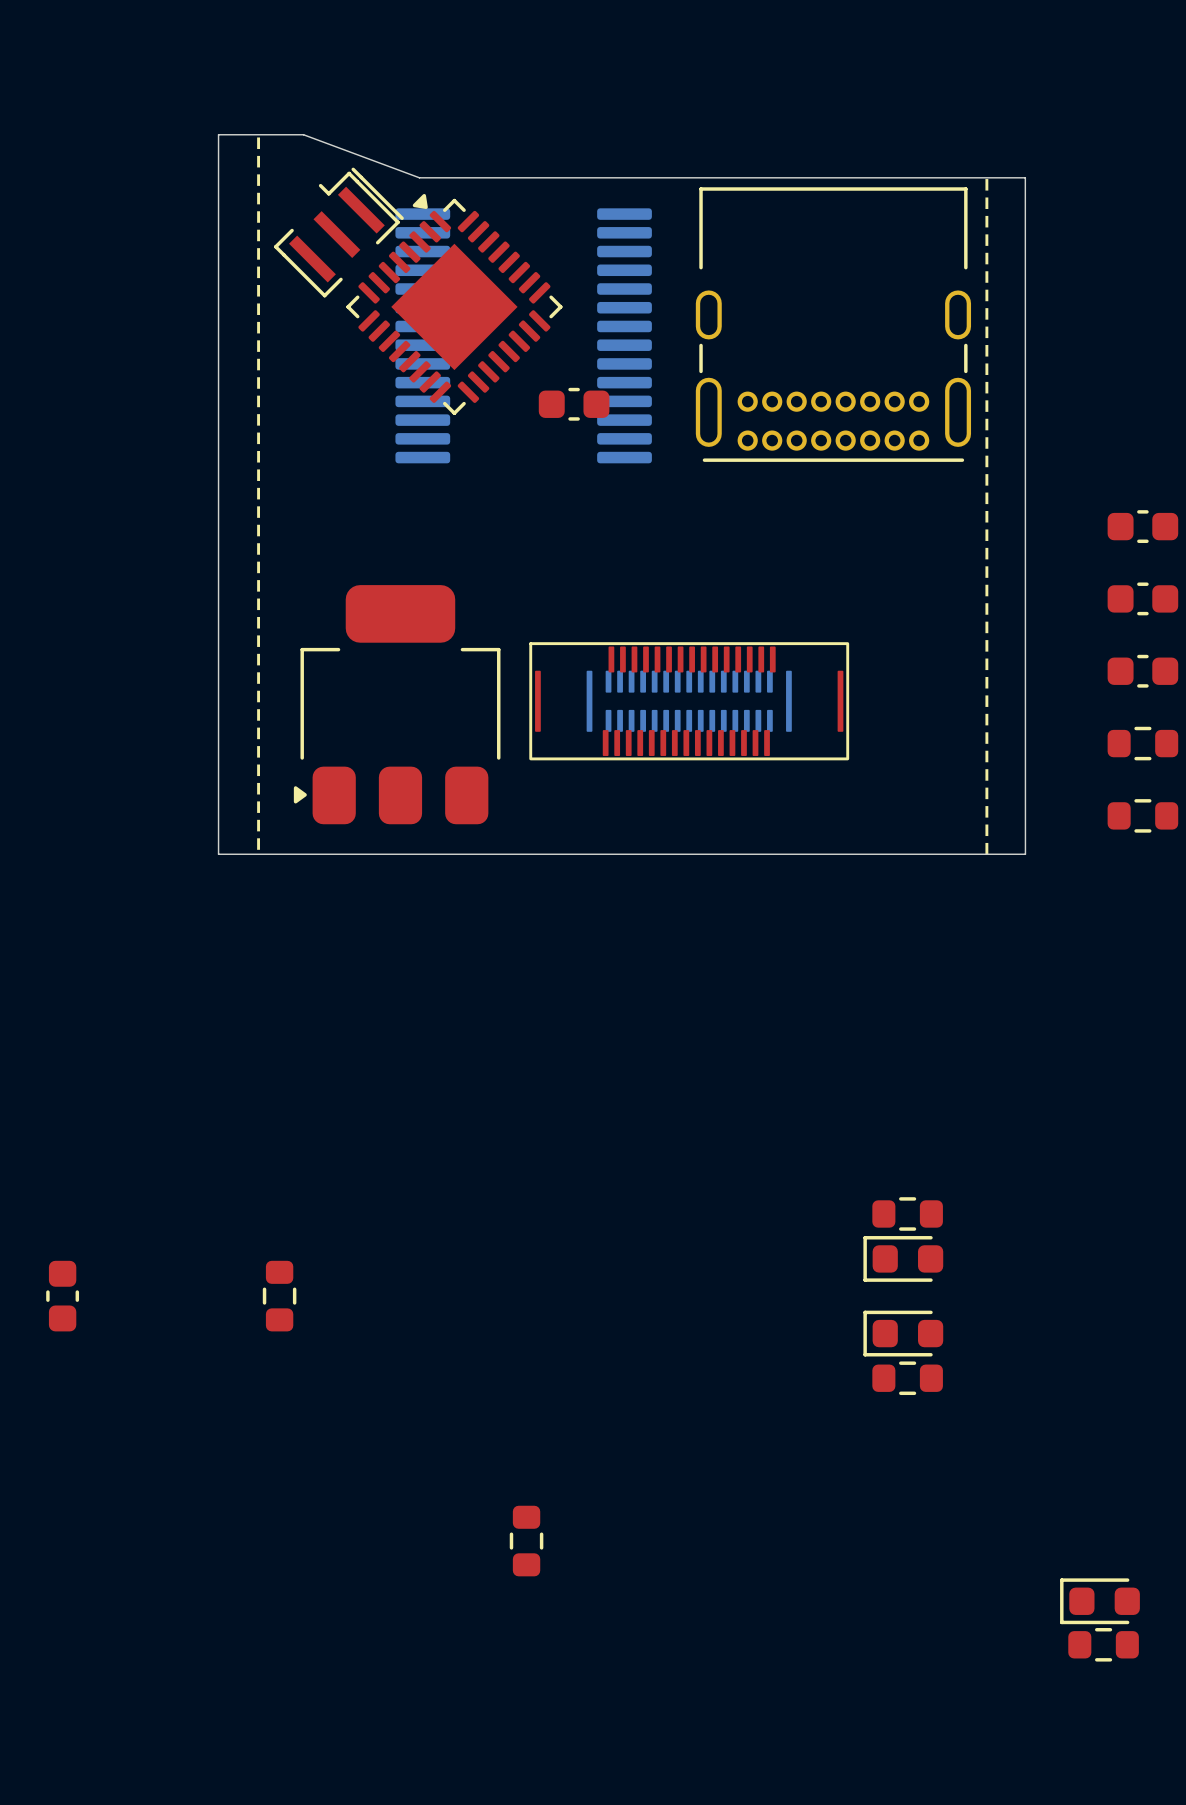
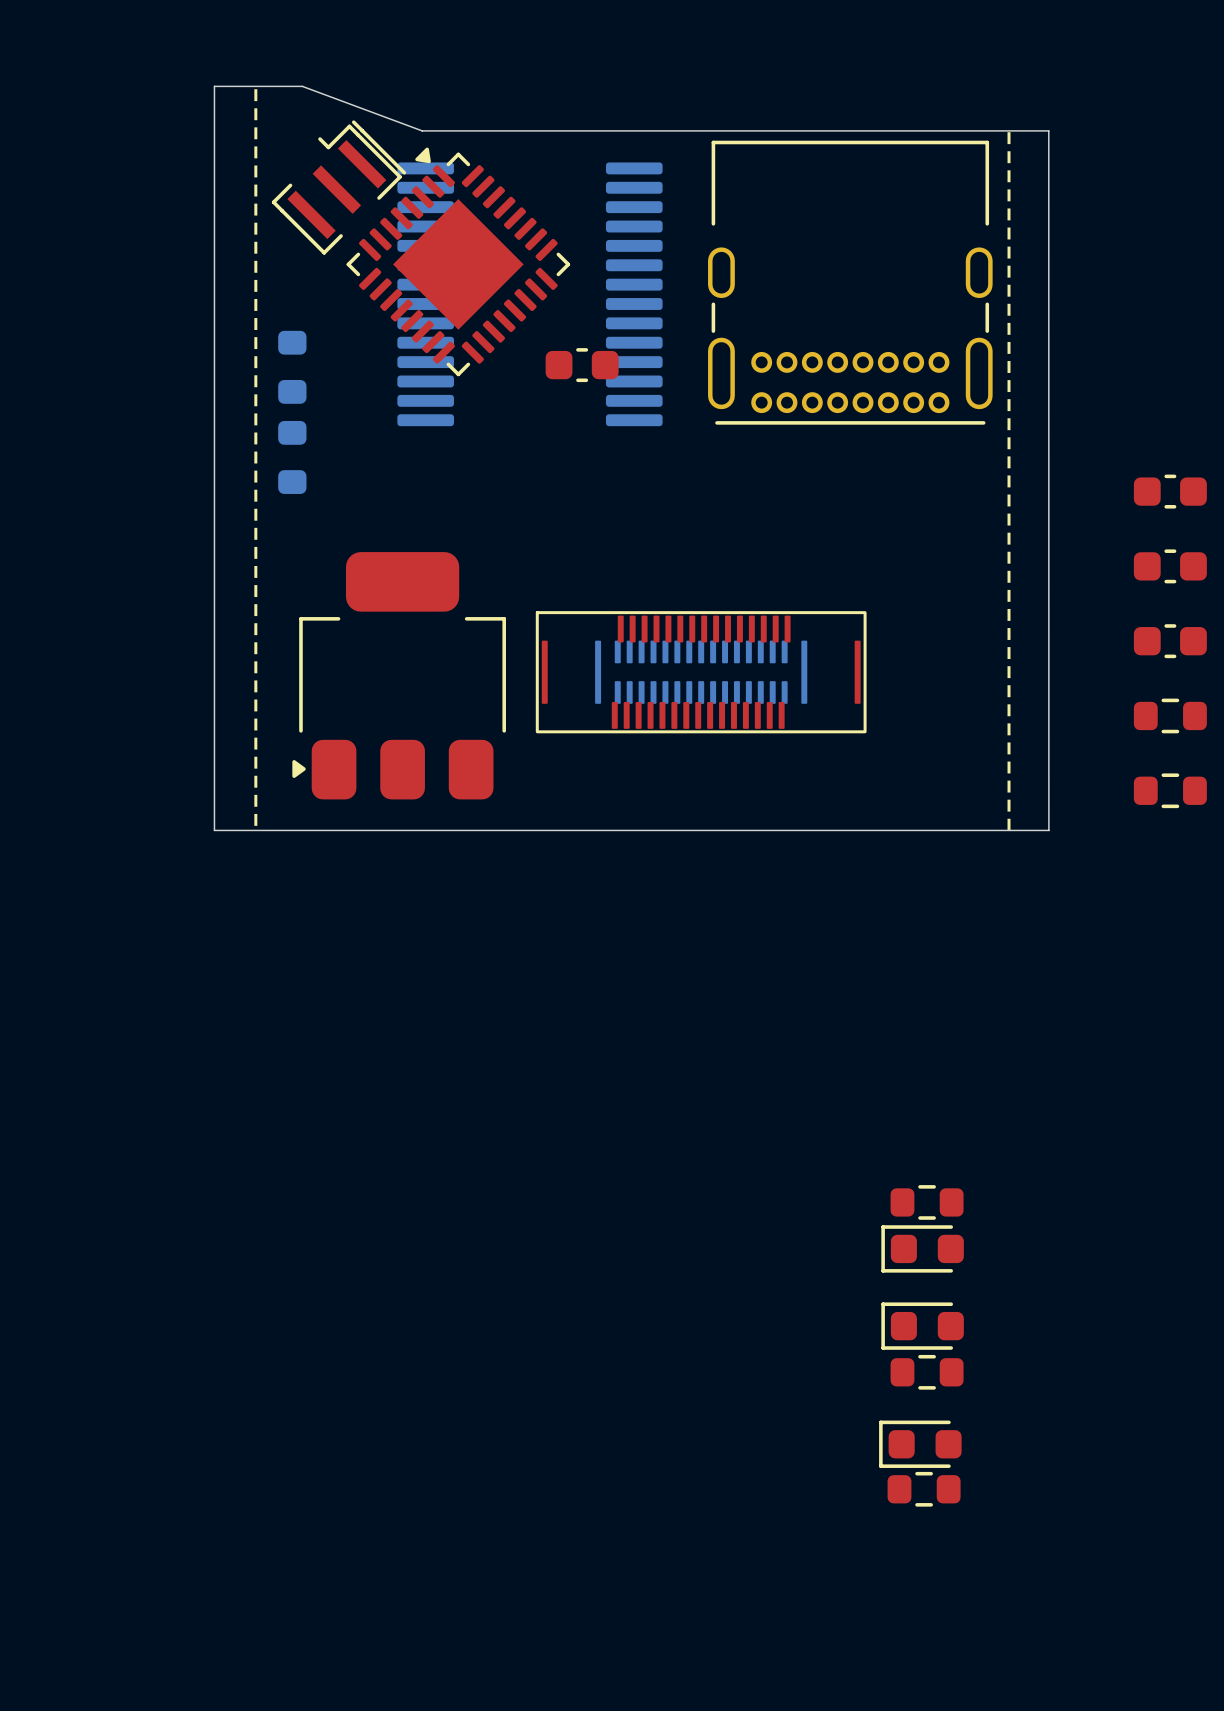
part: none -> (292, 367)
part: none -> (292, 457)
part: (62, 1296) -> none
part: (279, 1296) -> none
part: none -> (924, 1489)
part: (526, 1541) -> none
part position: (1099, 1601) -> (920, 1444)
part: (1103, 1644) -> none

